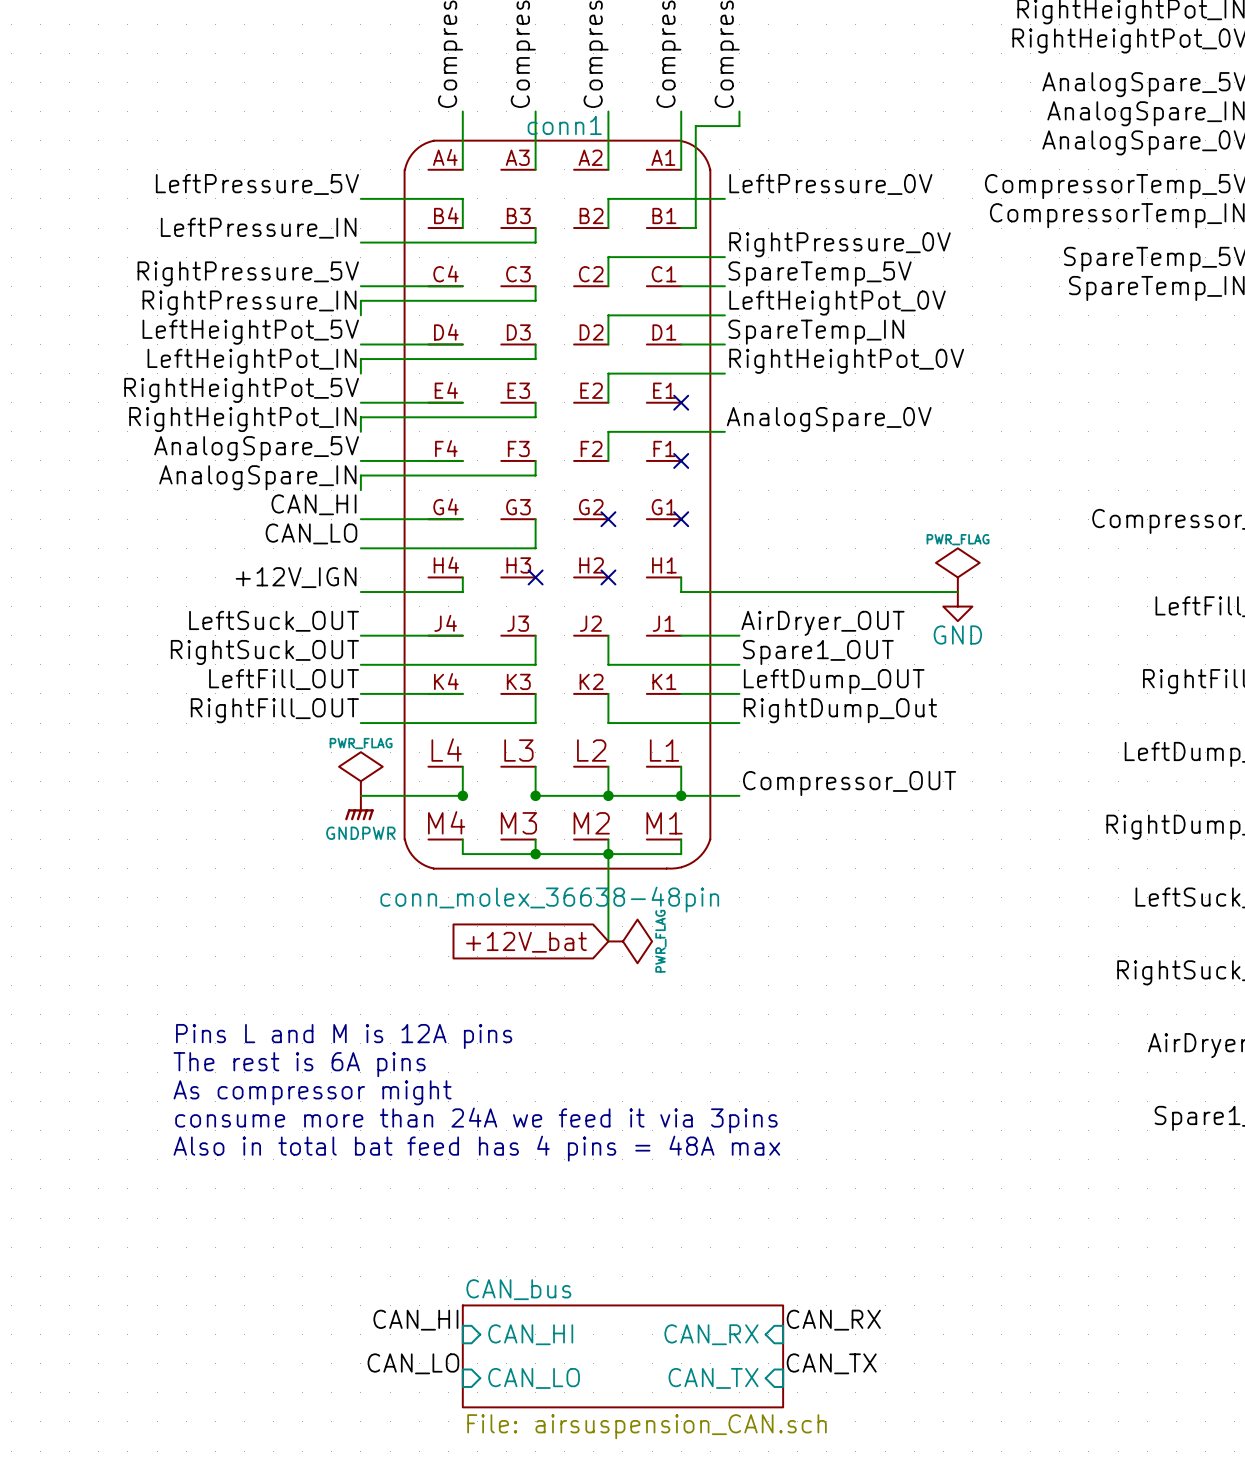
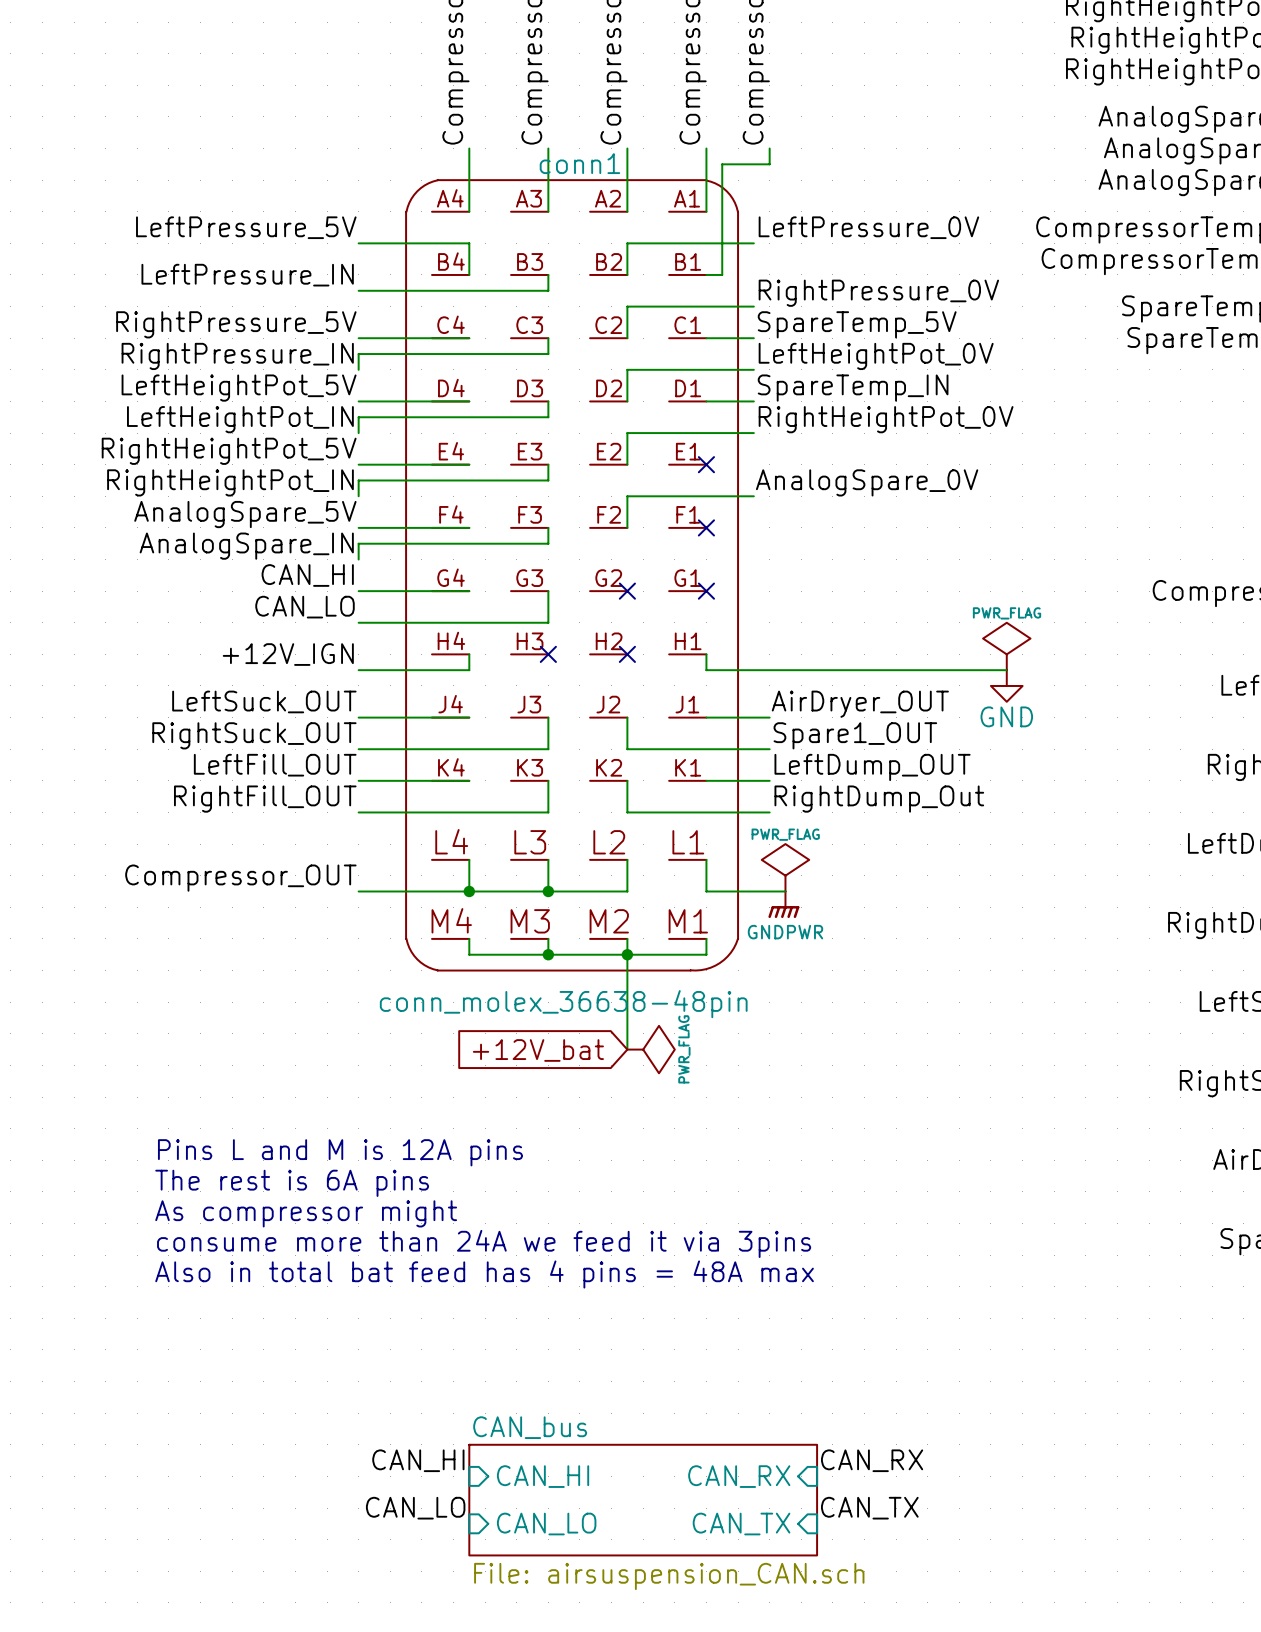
power symbol: PWR_FLAG (360, 774) -> none
power symbol: none -> PWR_FLAG (785, 867)
label: none -> Compressor_OUT (240, 878)
label: Compressor_OUT (849, 783) -> none
wire: (608, 795) (681, 795) -> (469, 891) (548, 891)
junction: (608, 795) -> none
junction: (681, 795) -> none
wire: none -> (769, 891) (785, 891)
power symbol: GNDPWR (359, 808) -> none
power symbol: none -> GNDPWR (783, 904)

